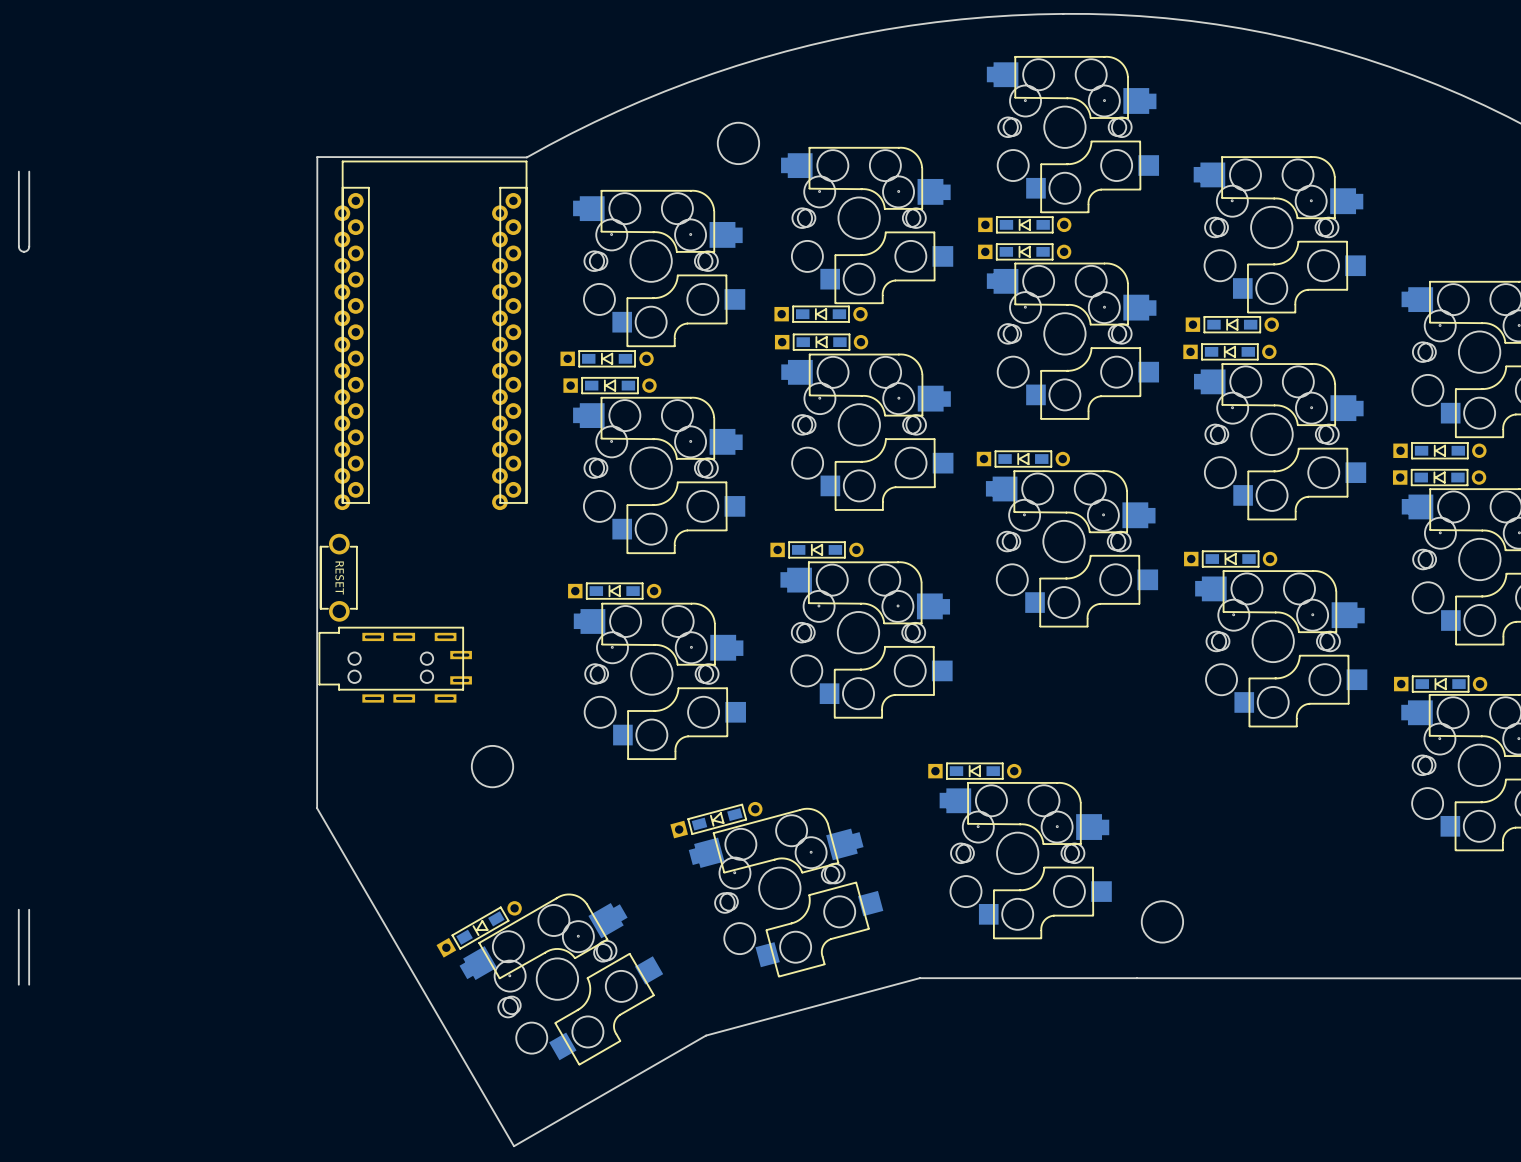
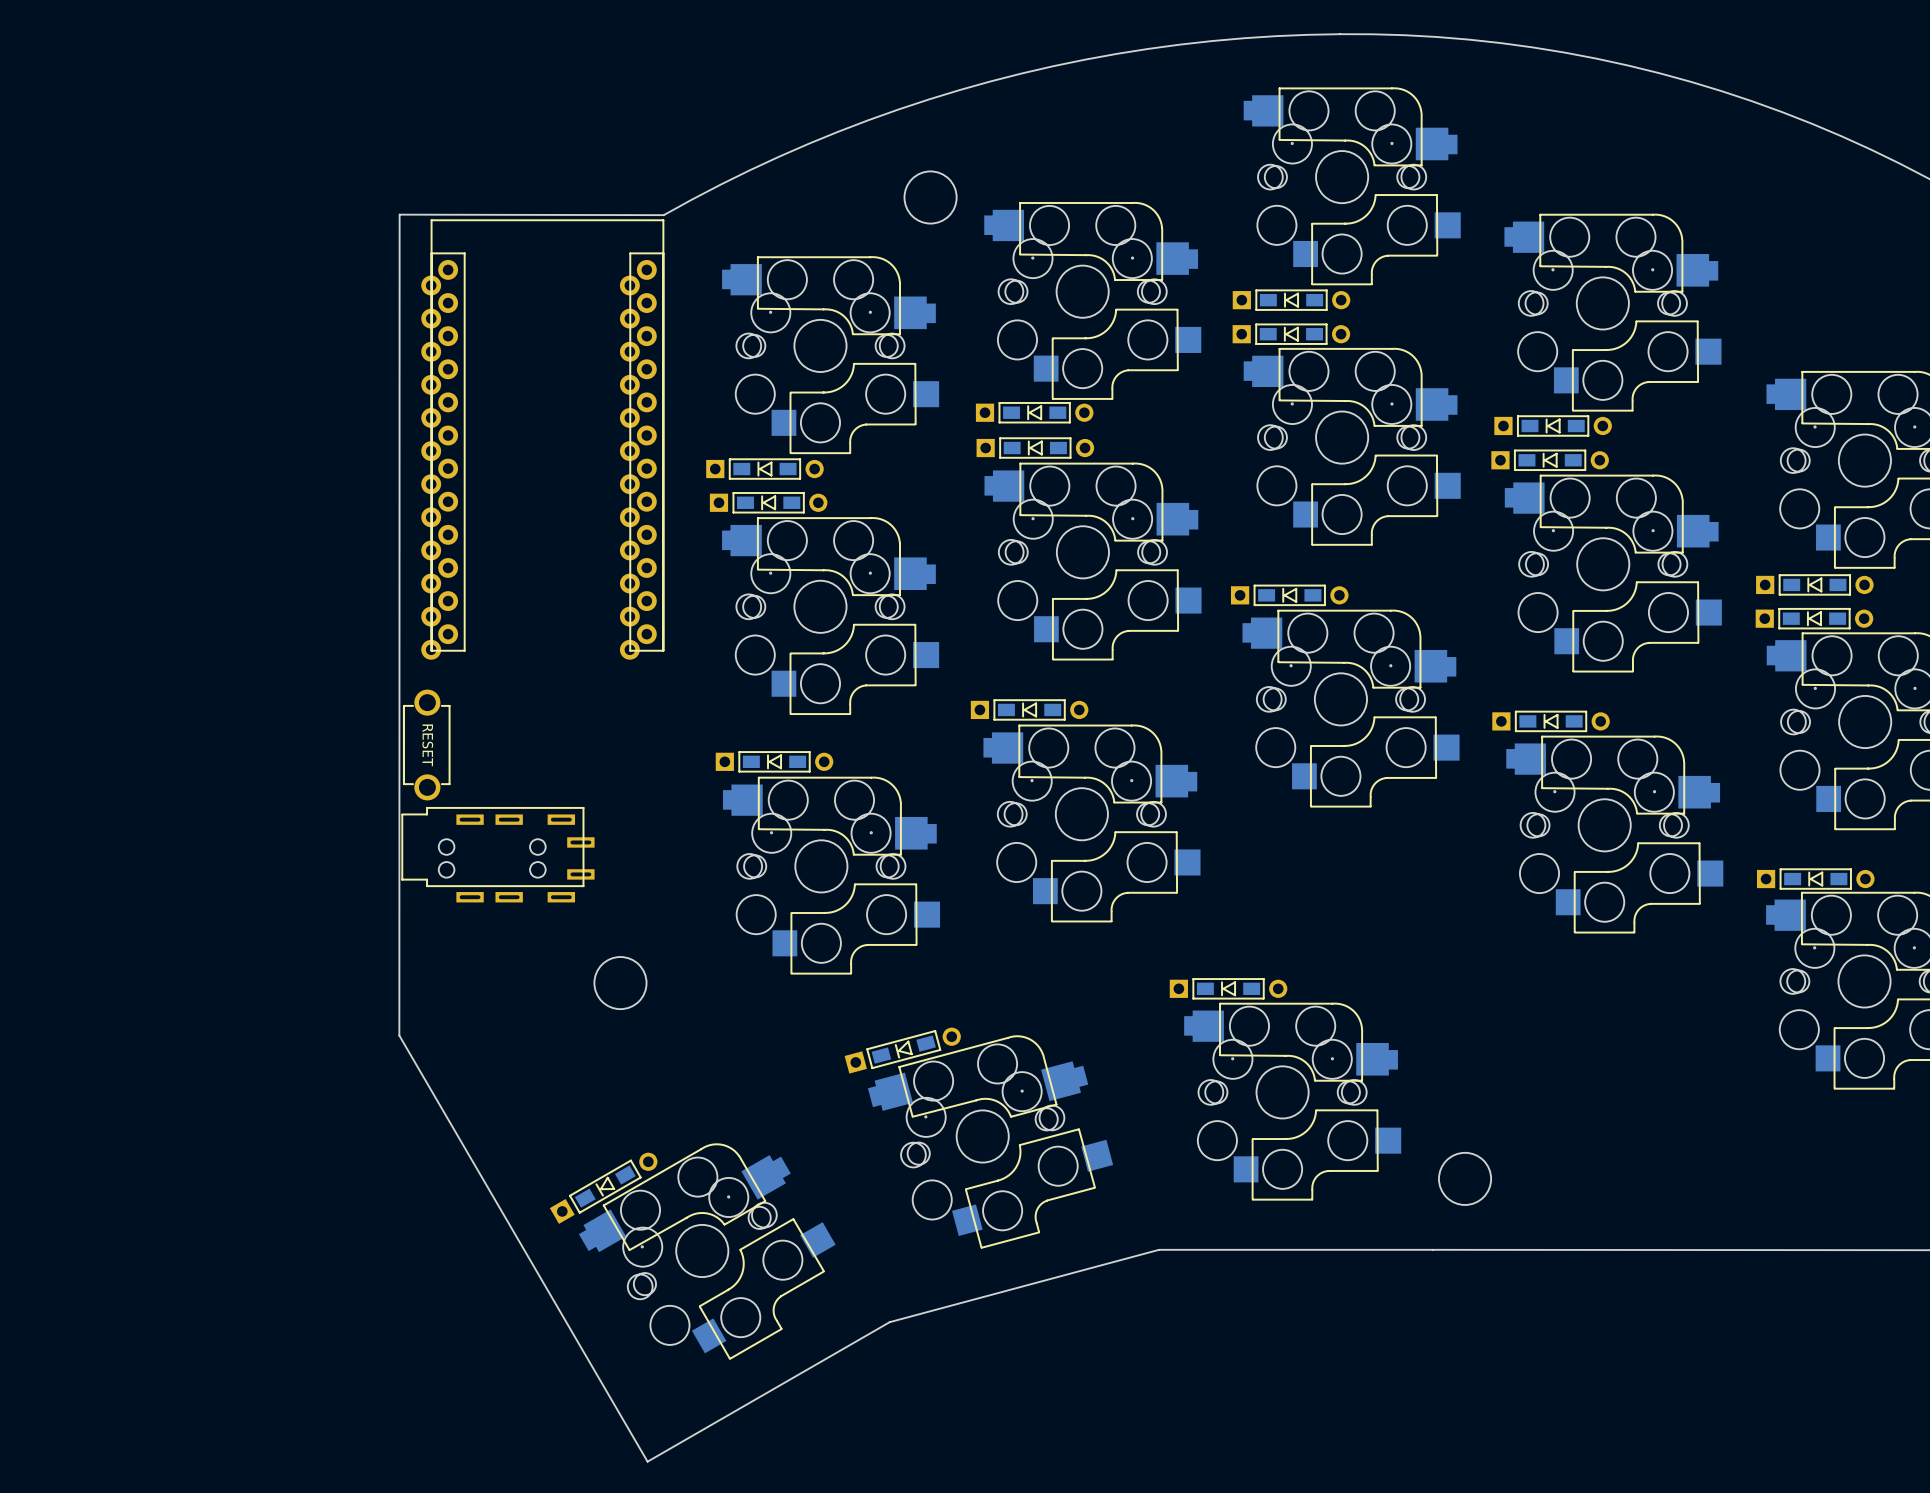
board edge: (29, 171) (29, 246) (27, 250) (24, 251) (20, 250) (18, 246) (18, 171) -> none
board edge: (18, 909) (18, 984) -> none
board edge: (29, 909) (29, 984) -> none

